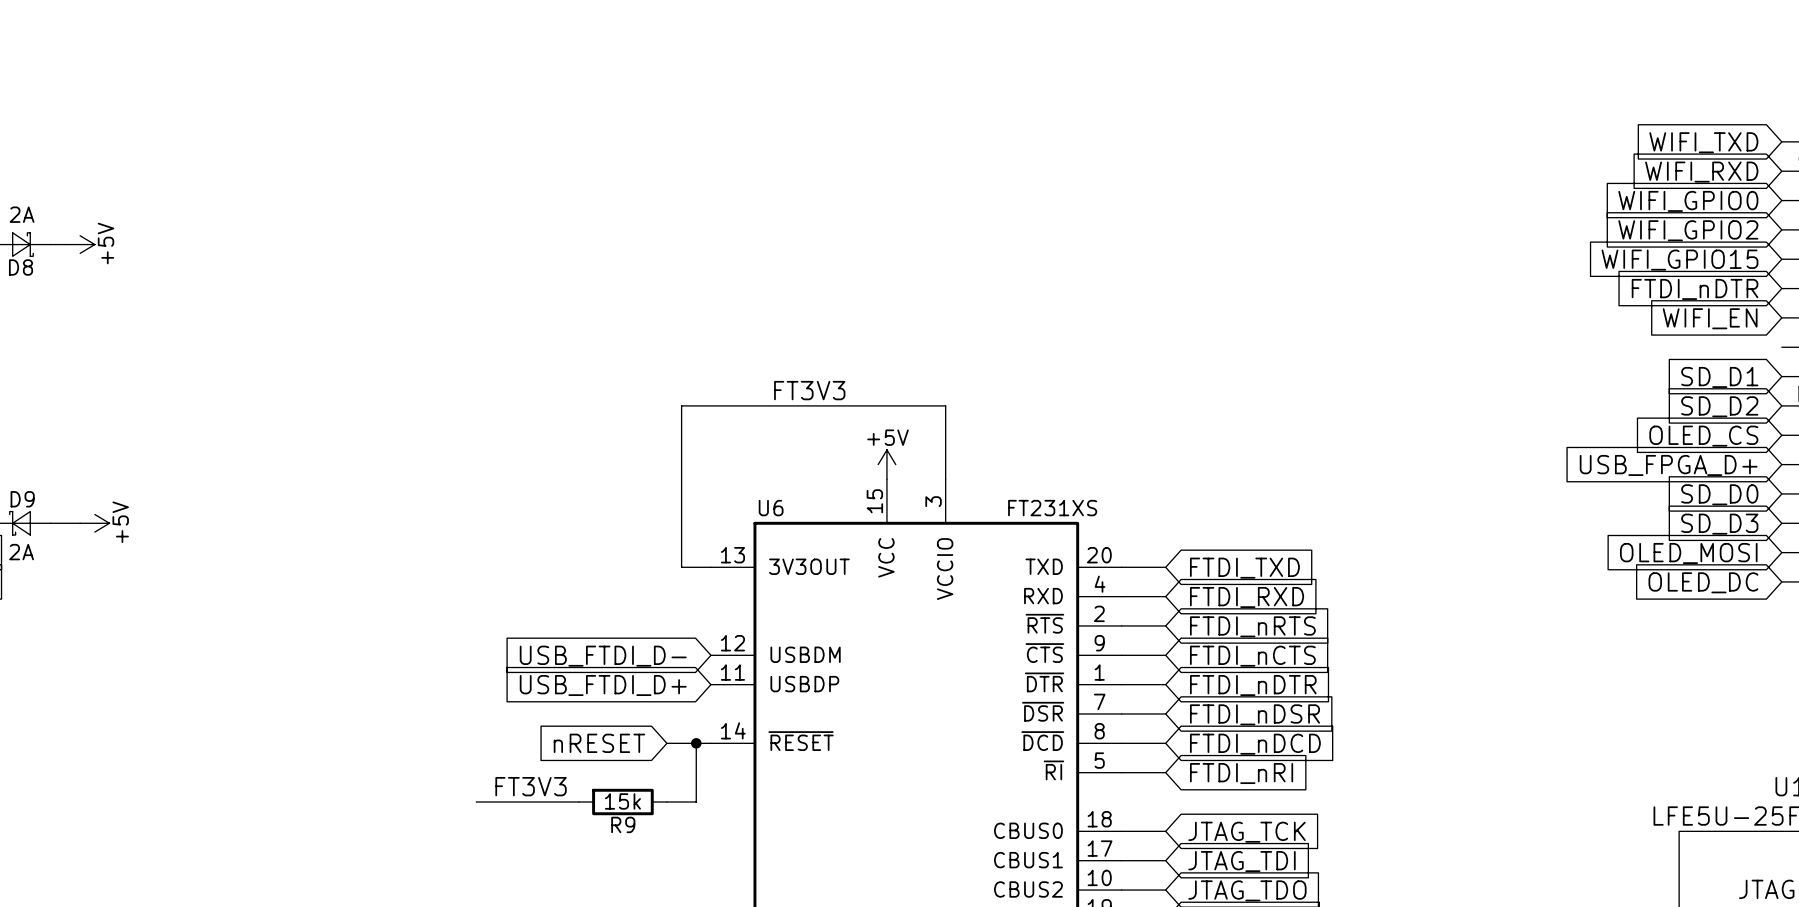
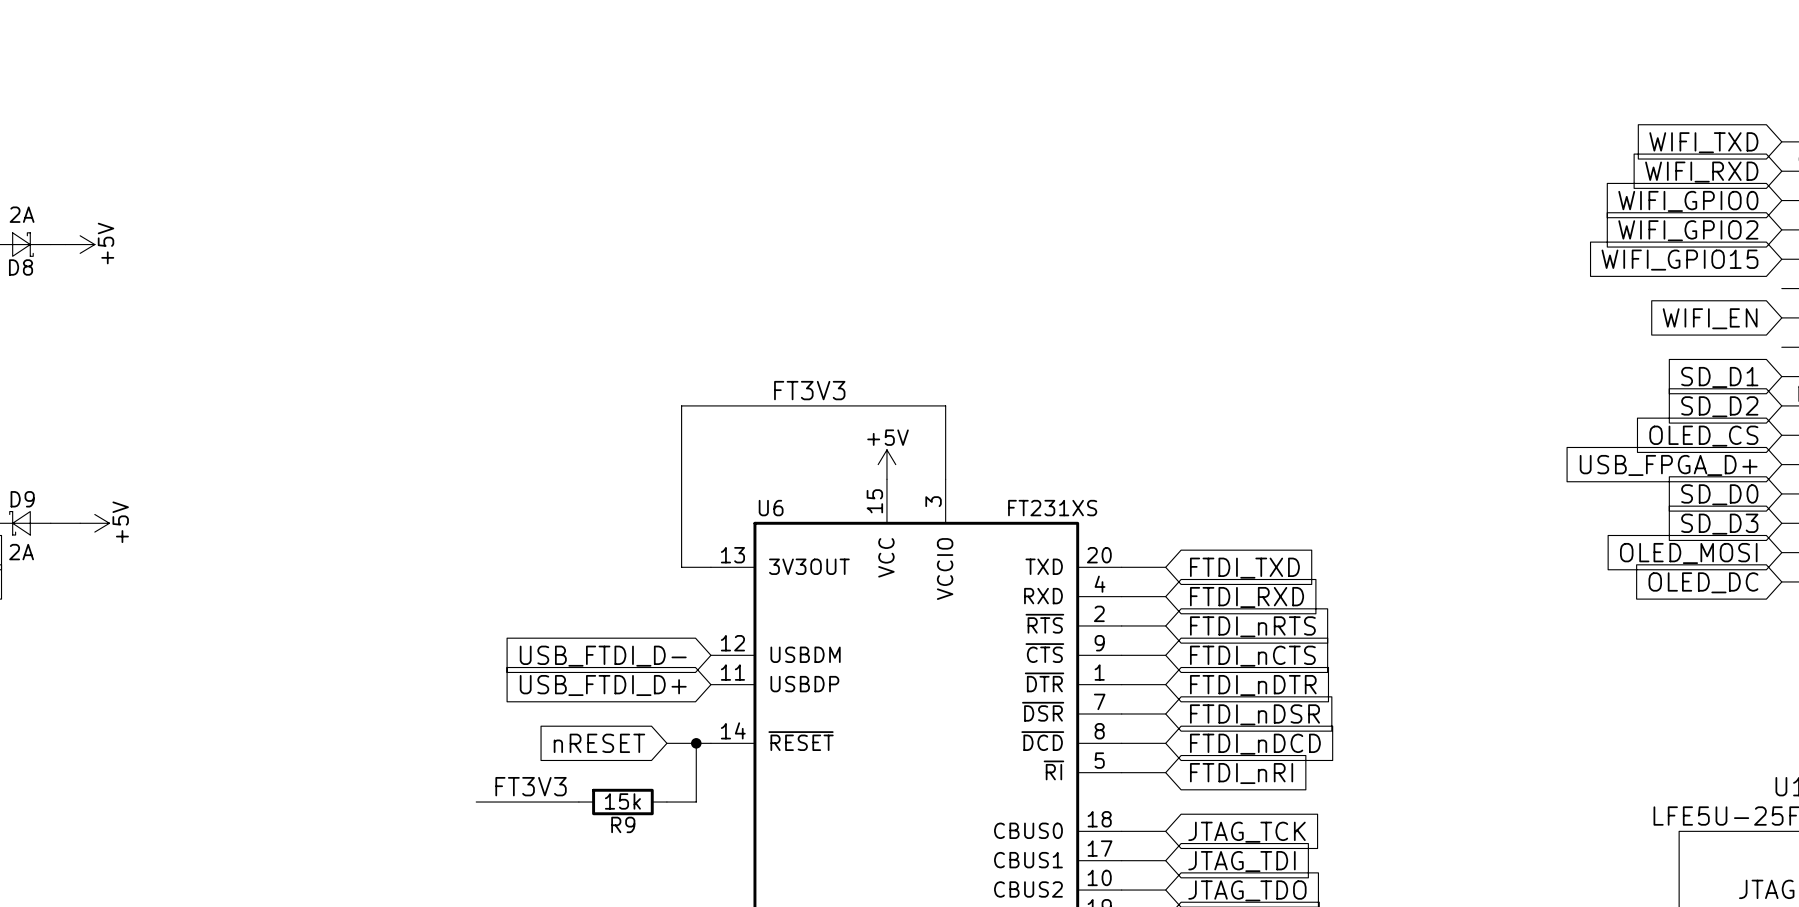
global label: FTDI_nDTR (1695, 289) -> none

